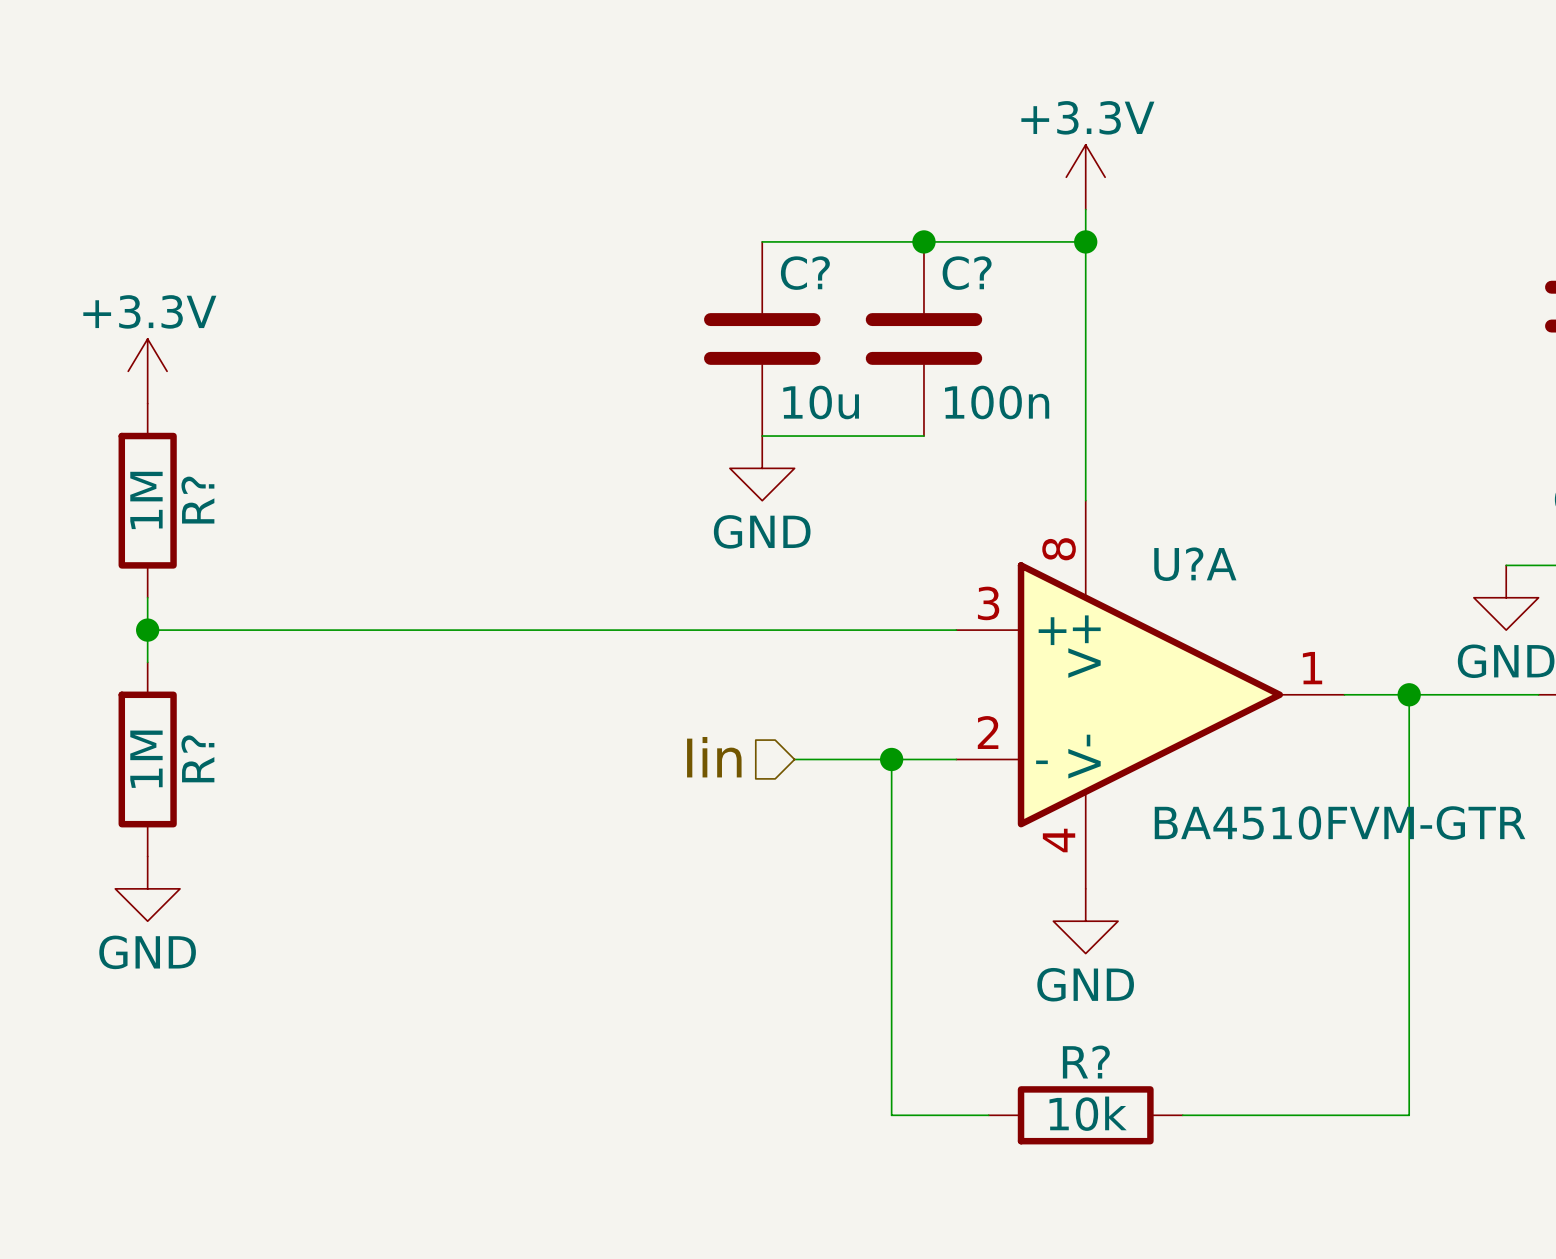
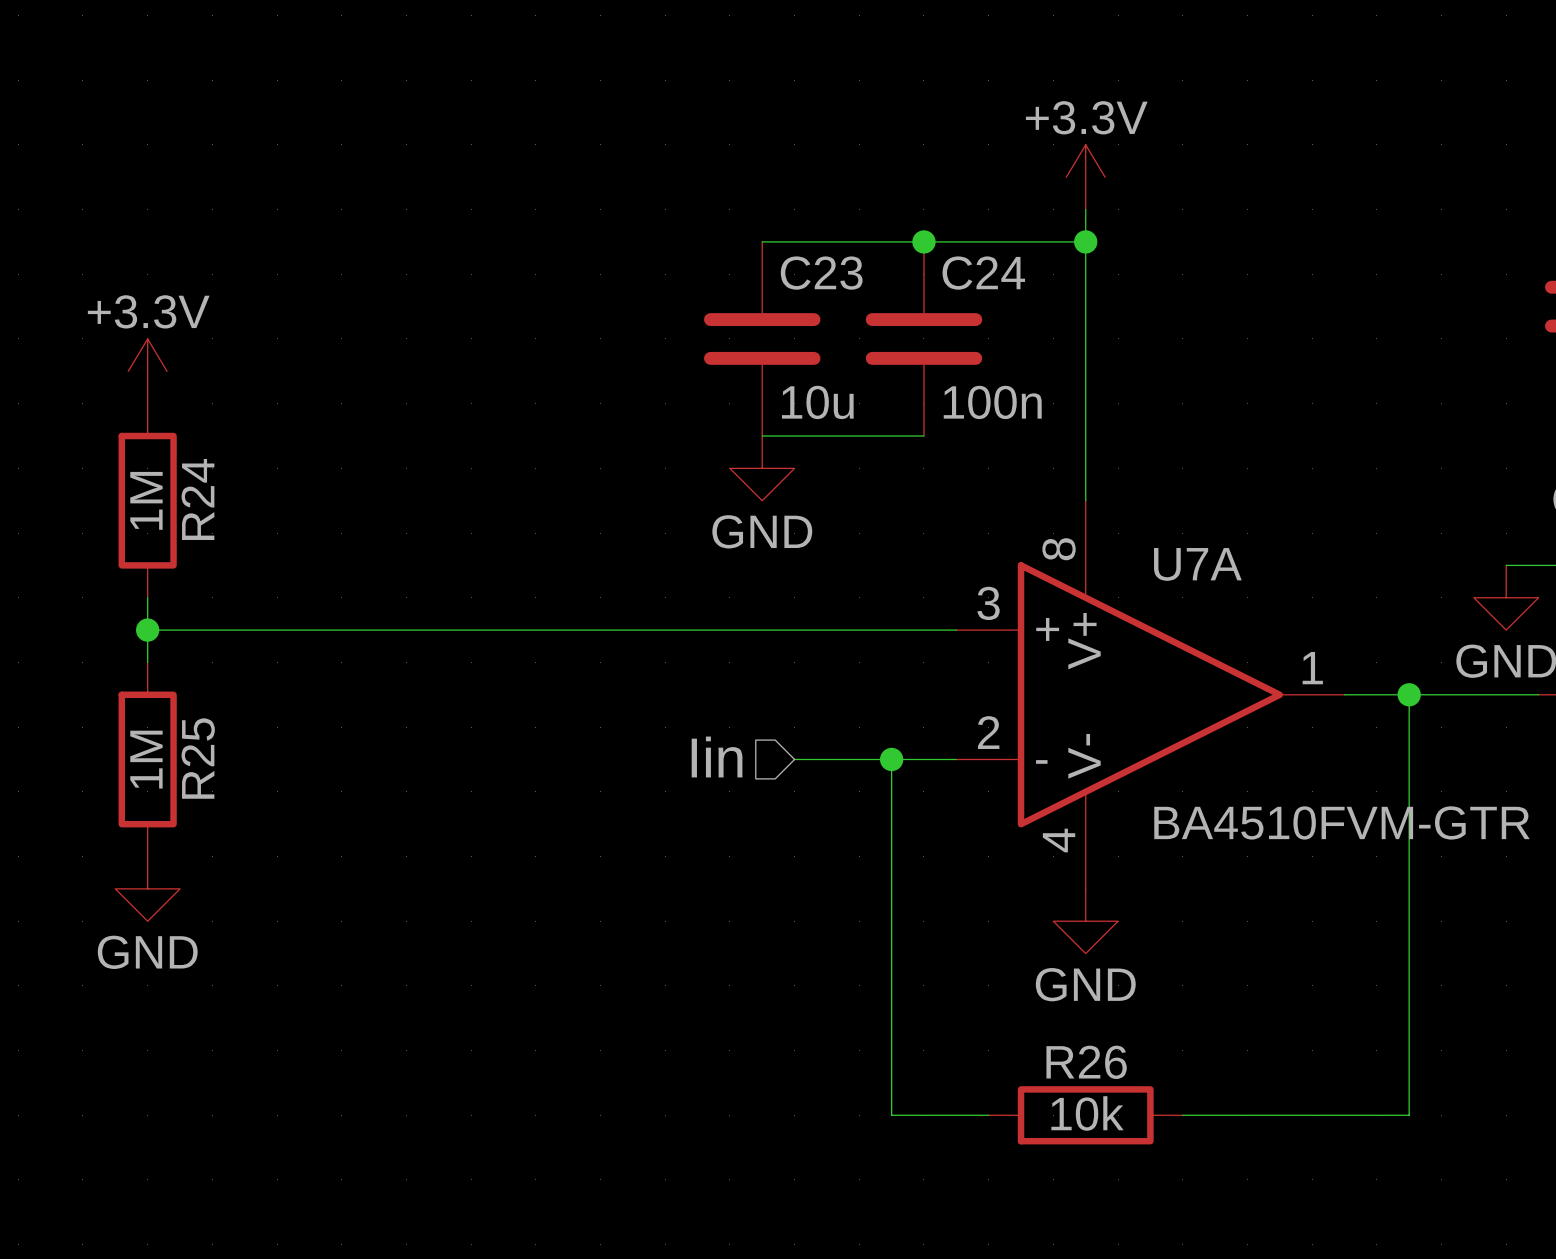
C? name: C? (805, 273) -> C23 (821, 273)
C? name: C? (967, 273) -> C24 (983, 273)
R? name: R? (197, 500) -> R24 (197, 499)
U?A name: U?A (1195, 564) -> U7A (1197, 564)
R? name: R? (197, 758) -> R25 (198, 758)
R? name: R? (1086, 1062) -> R26 (1086, 1062)

